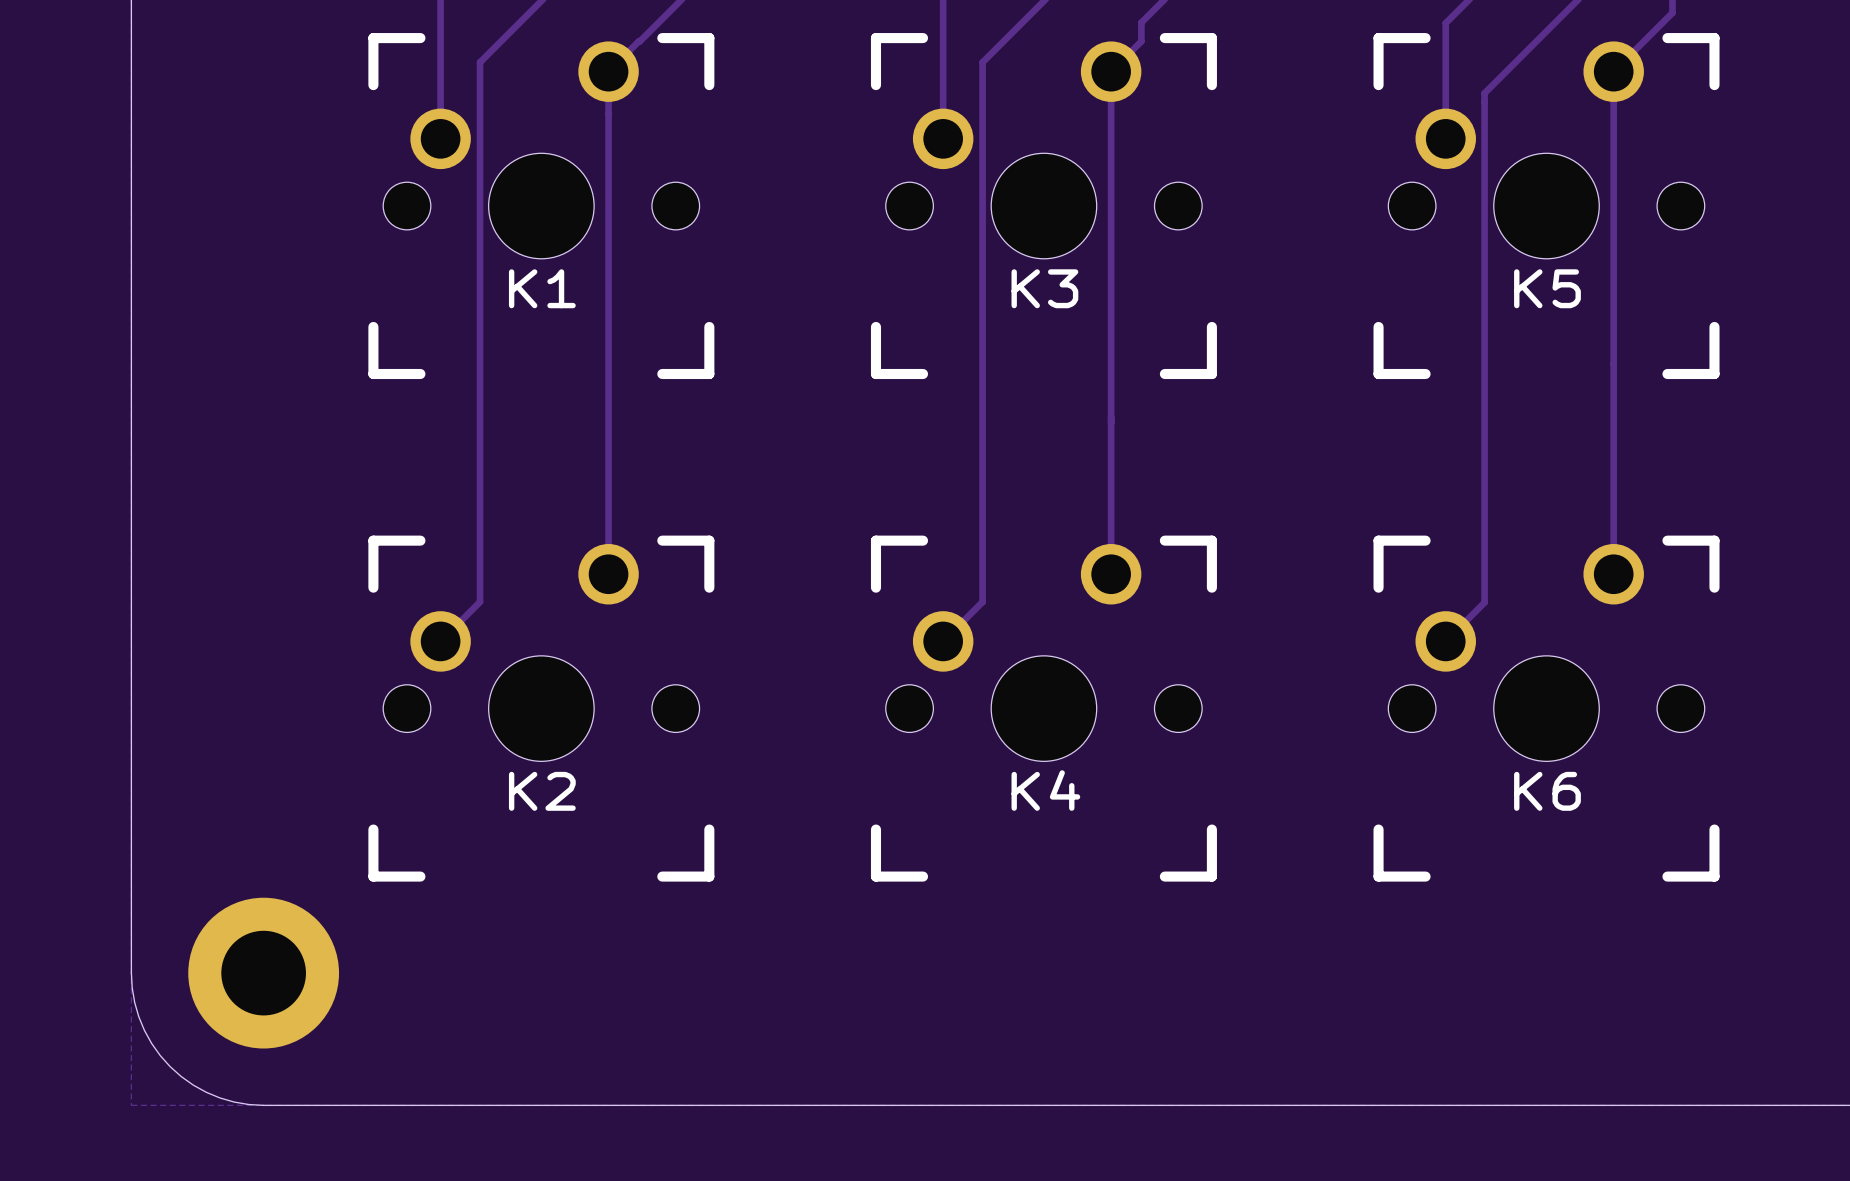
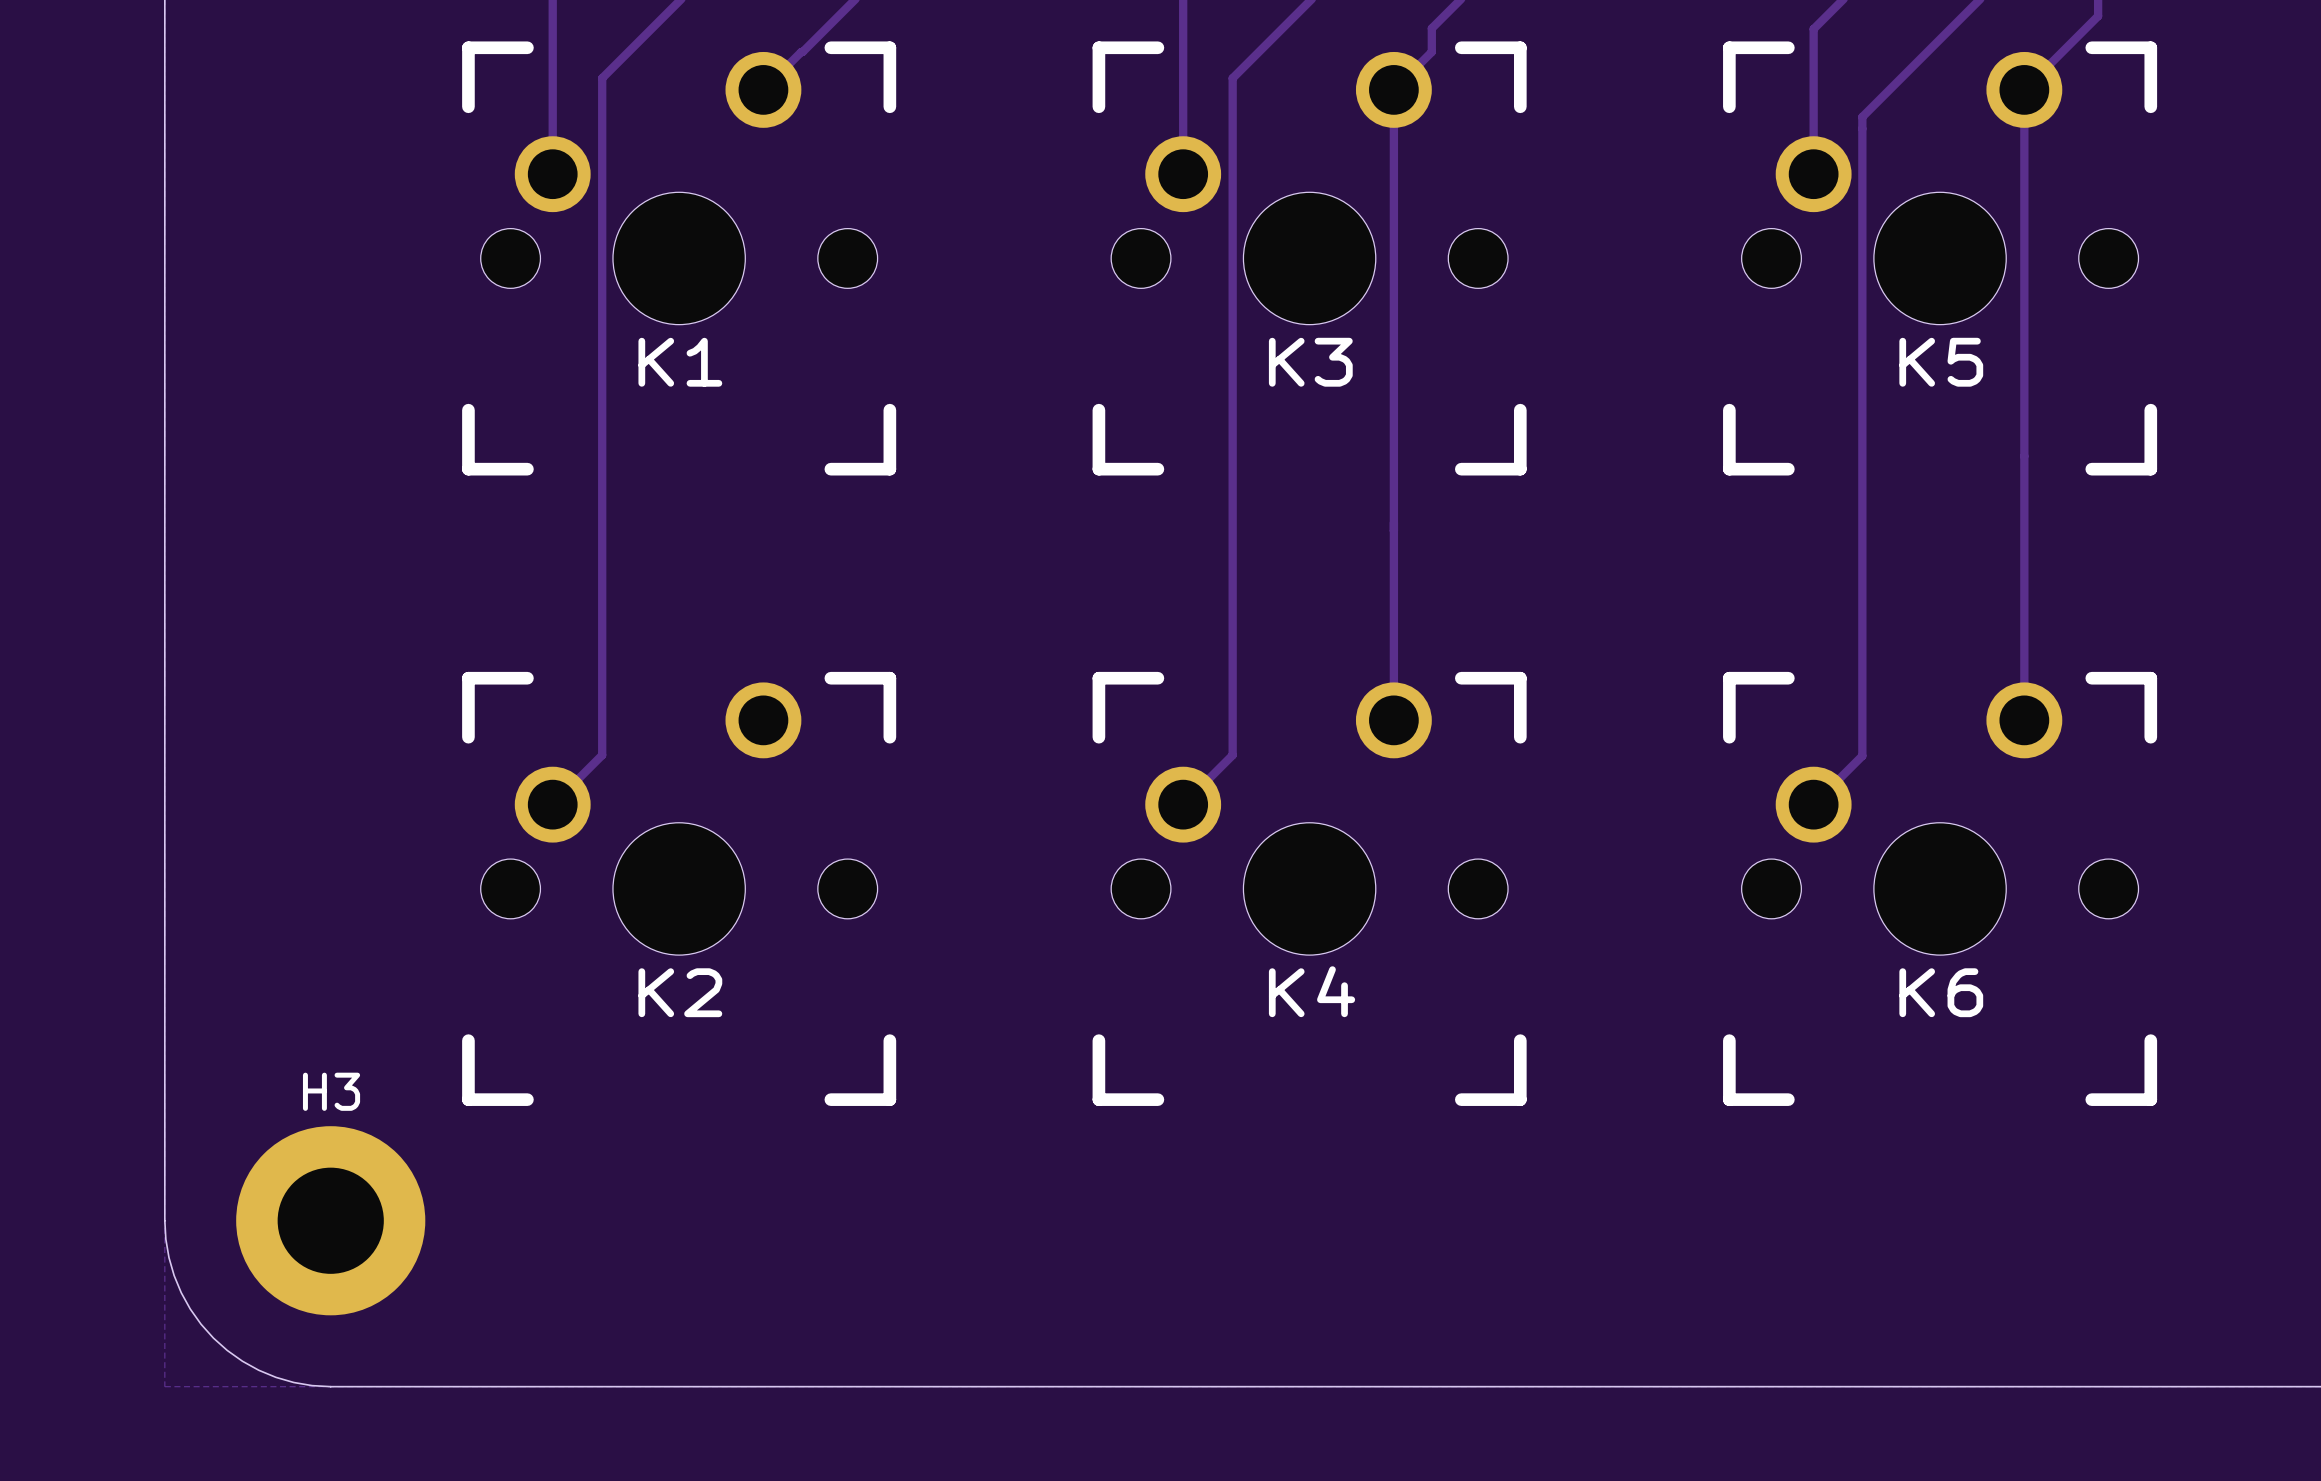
track: (608, 71) (608, 574) -> none
H3 name: none -> H3 (331, 1091)

